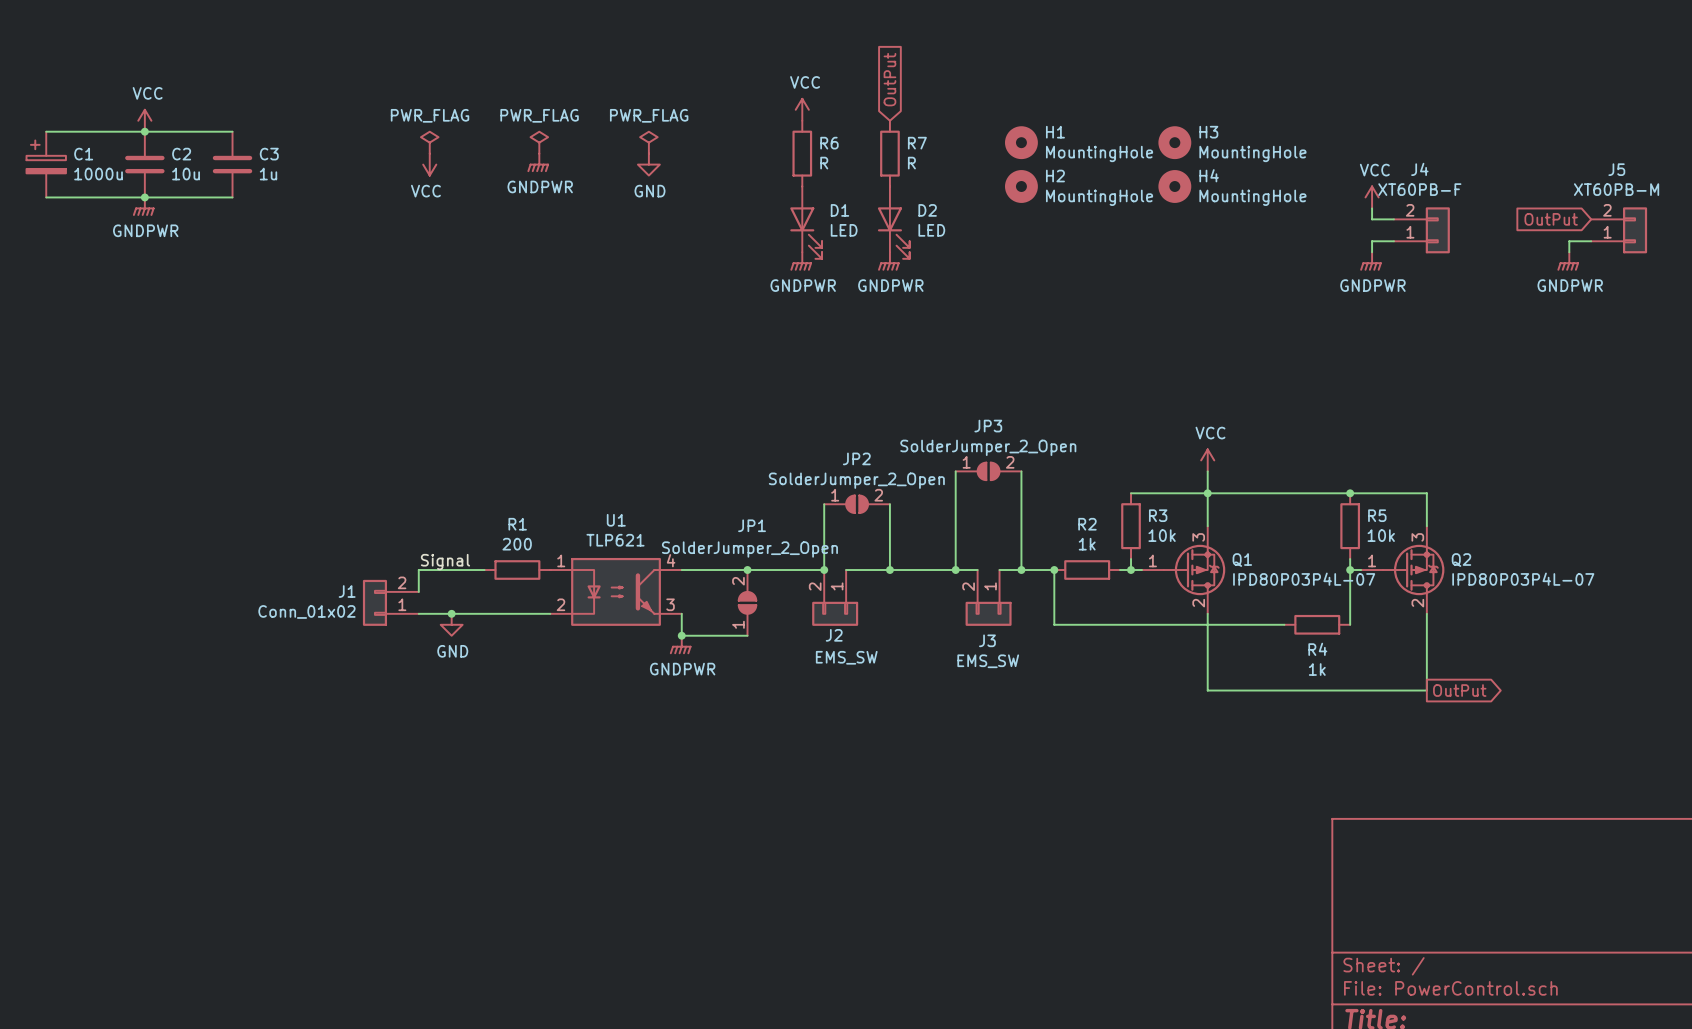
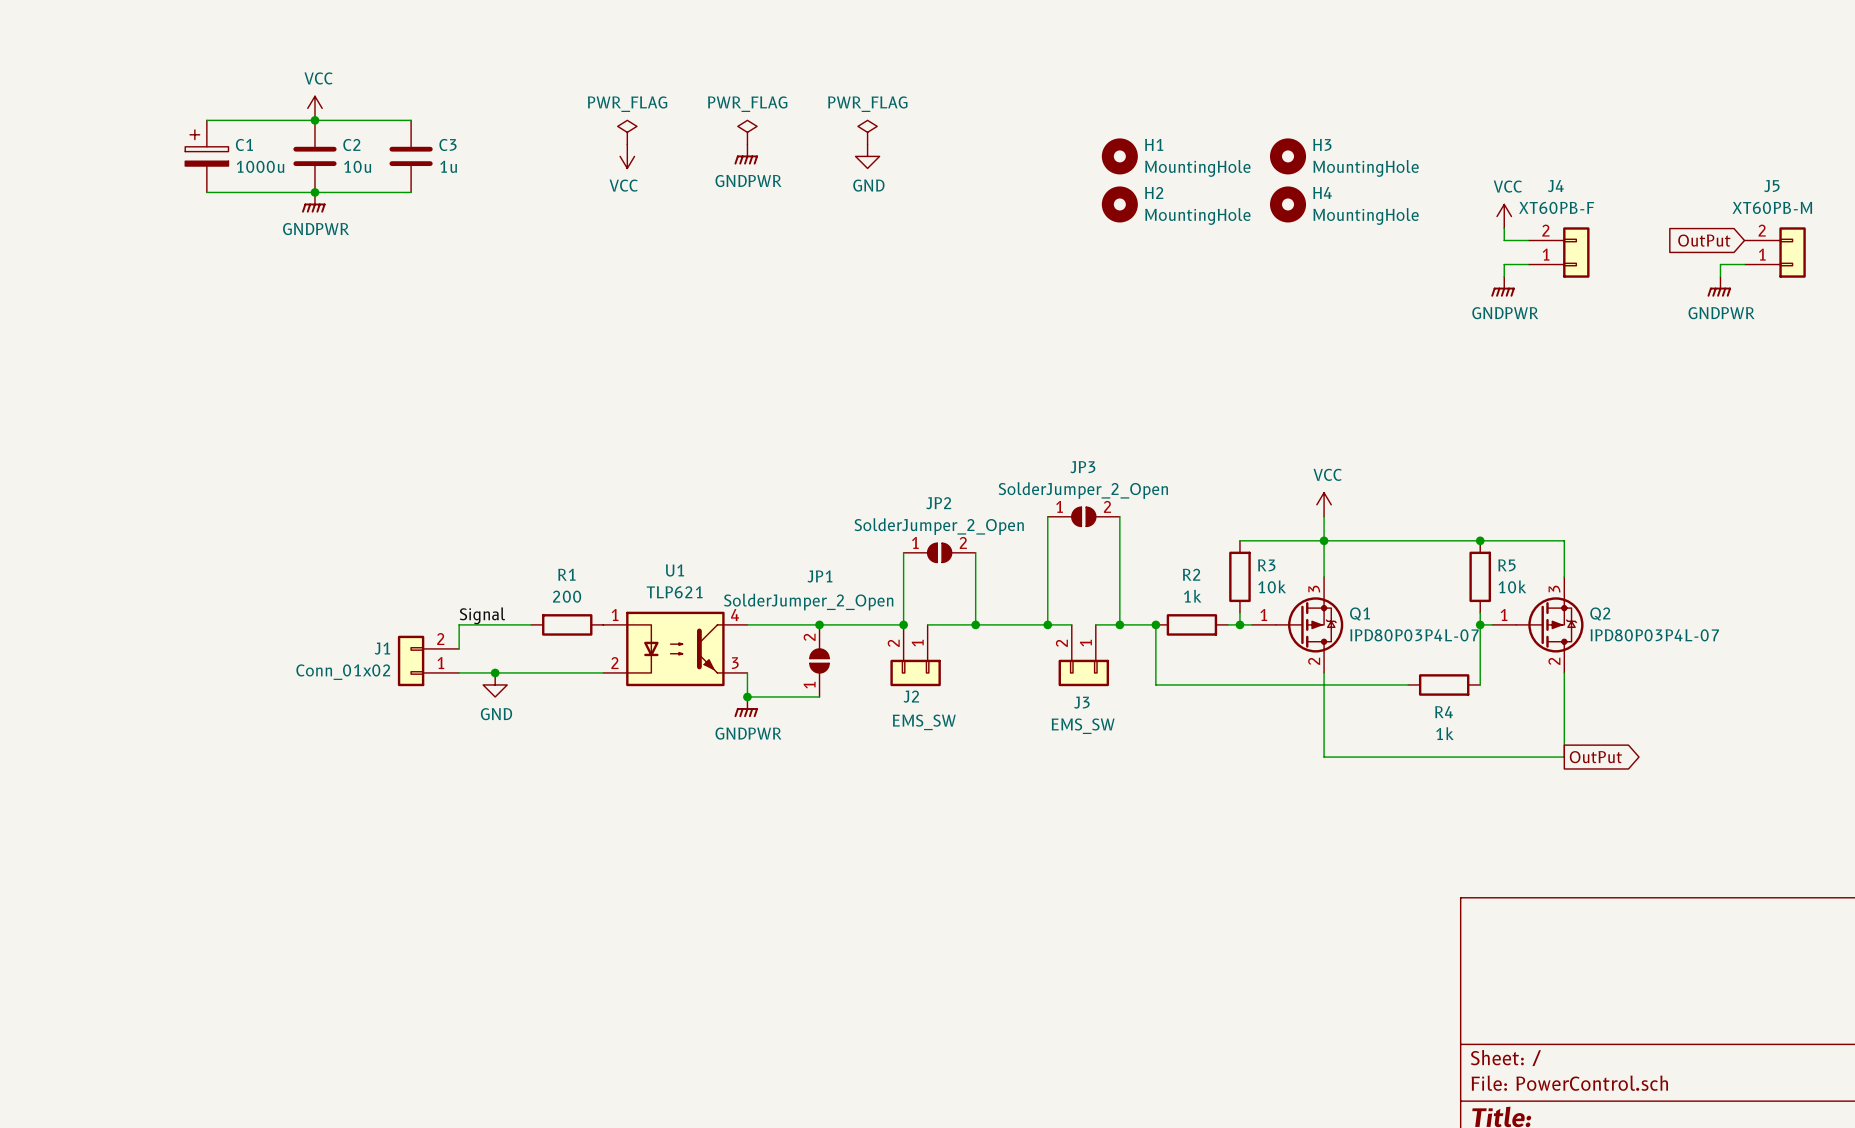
global label: OutPut (889, 79) -> none
power symbol: none -> VCC (314, 108)
junction: none -> (314, 120)
power symbol: VCC (802, 109) -> none
power symbol: VCC (144, 120) -> none
power symbol: none -> PWR_FLAG (867, 132)
wire: (46, 131) (232, 131) -> (206, 120) (411, 120)
junction: (144, 131) -> none
power symbol: none -> GNDPWR (746, 154)
power symbol: PWR_FLAG (429, 142) -> none
power symbol position: PWR_FLAG (539, 142) -> PWR_FLAG (627, 132)
power symbol: none -> VCC (627, 156)
power symbol position: PWR_FLAG (648, 142) -> PWR_FLAG (747, 132)
R6: R (802, 153) -> none
R7: R (889, 153) -> none
power symbol: GNDPWR (538, 162) -> none
C1 position: (46, 164) -> (206, 156)
C2 position: (144, 164) -> (314, 156)
C3 position: (232, 164) -> (411, 156)
power symbol: VCC (429, 164) -> none
power symbol position: GND (648, 164) -> GND (867, 156)
junction: none -> (314, 192)
power symbol: none -> GNDPWR (313, 202)
wire: (46, 197) (232, 197) -> (206, 192) (411, 192)
junction: (144, 197) -> none
power symbol: GNDPWR (143, 206) -> none
D1: LED (806, 222) -> none
D2: LED (893, 222) -> none
power symbol: GNDPWR (801, 261) -> none
power symbol: GNDPWR (888, 261) -> none

